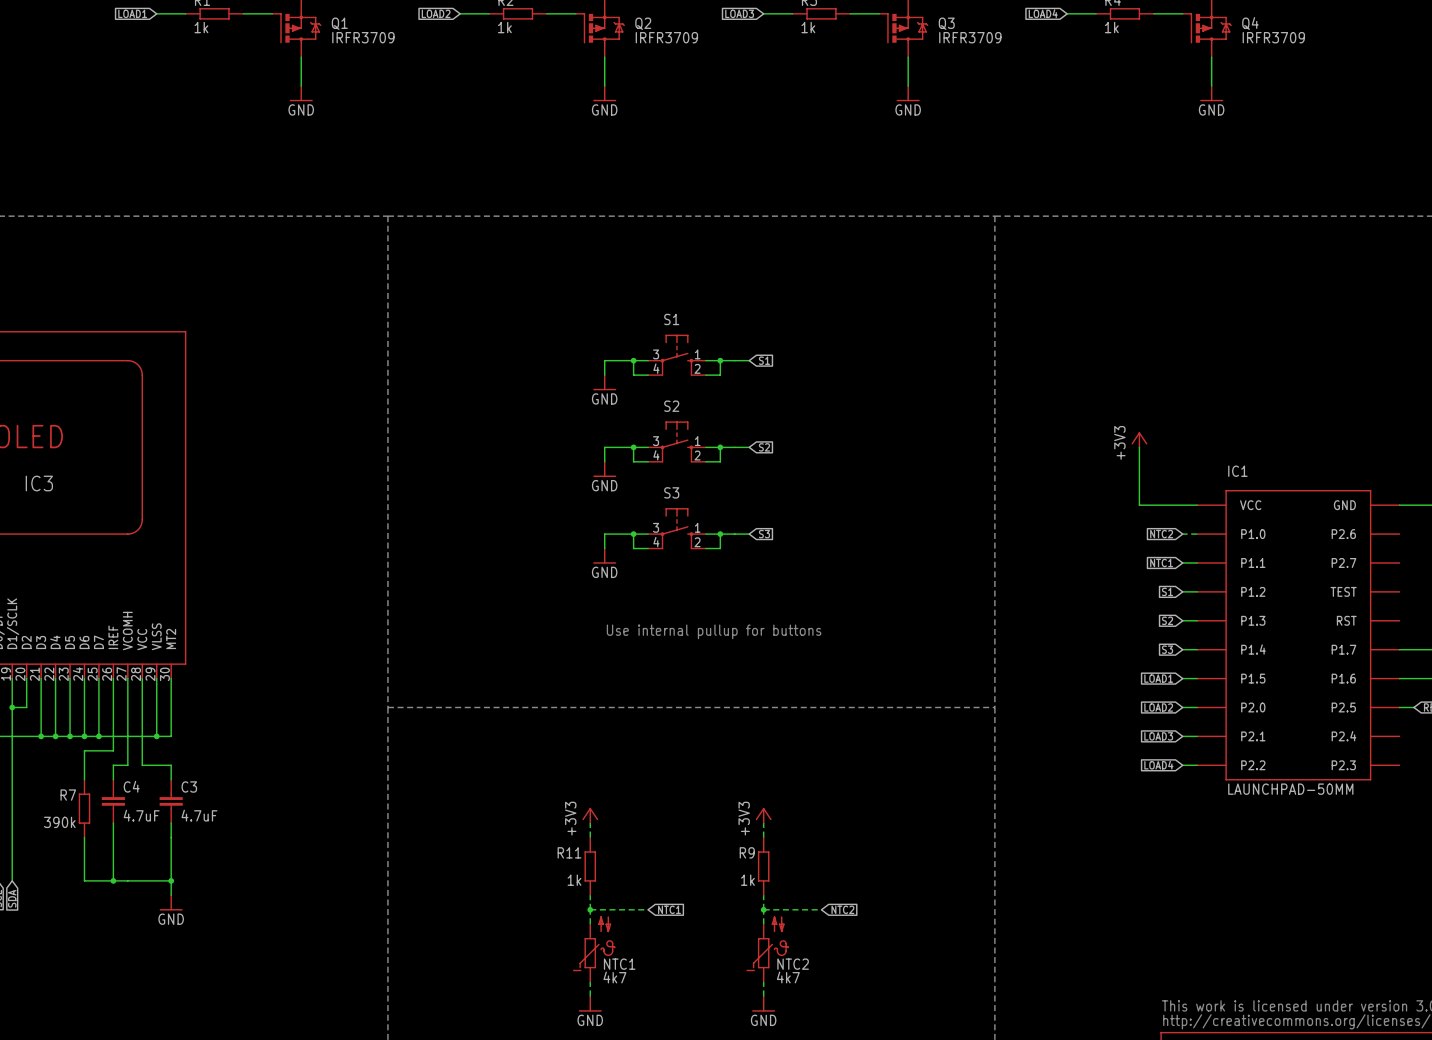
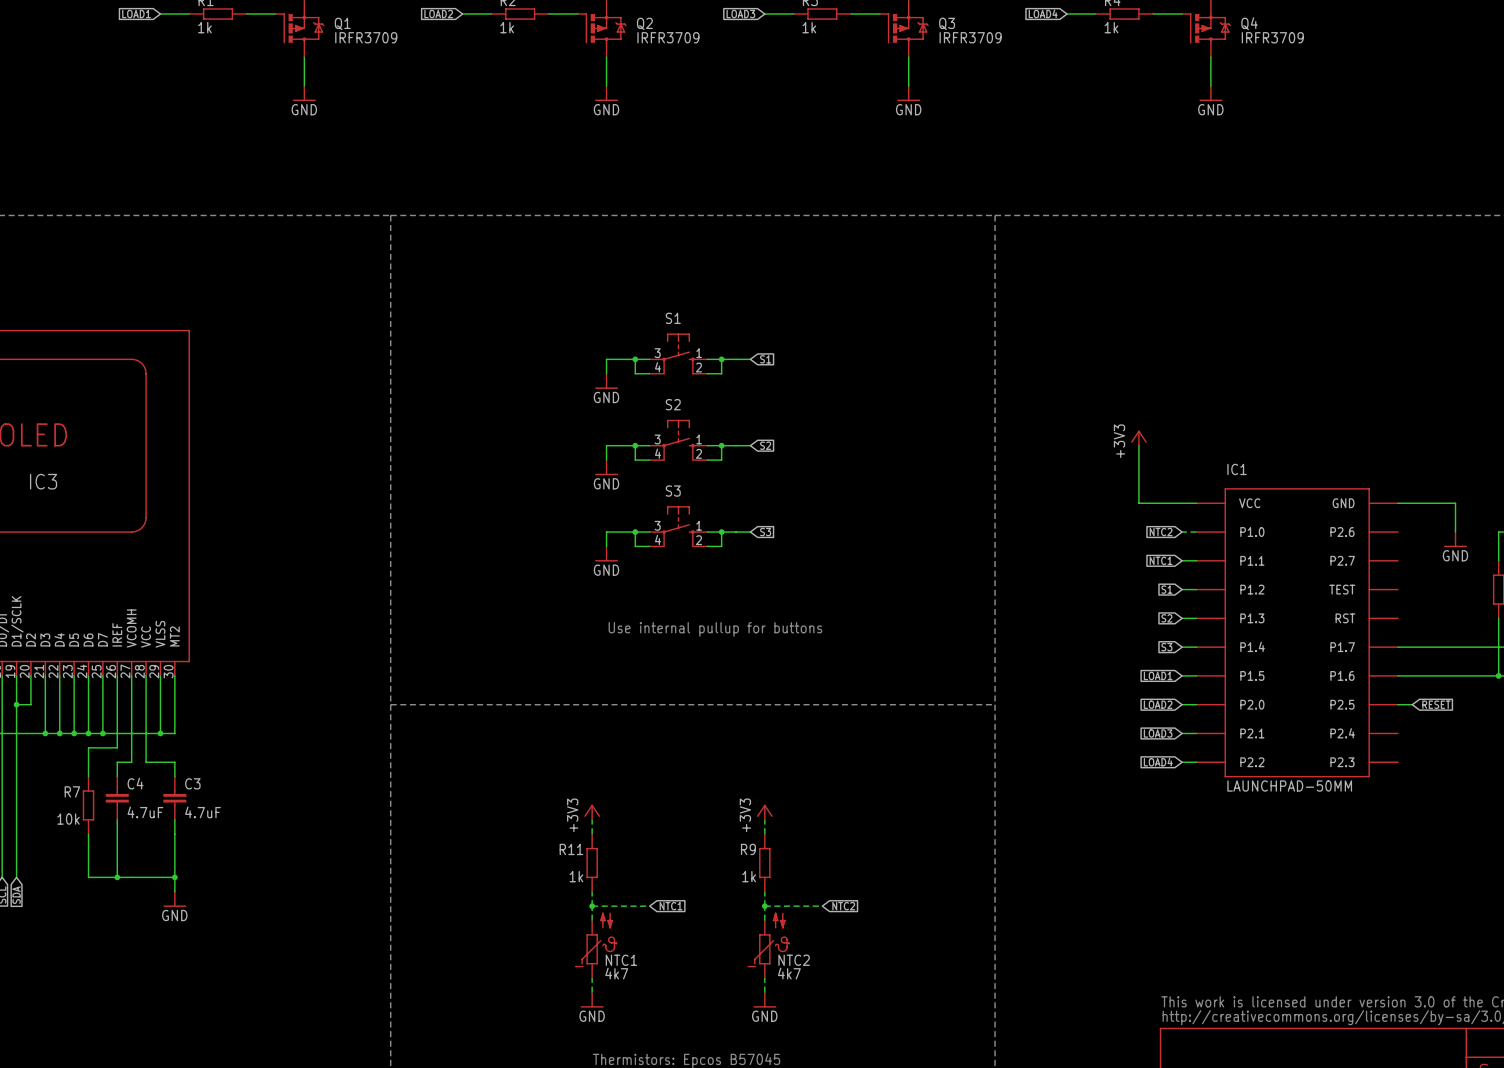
R7 value: 390k (59, 822) -> 10k (68, 819)

